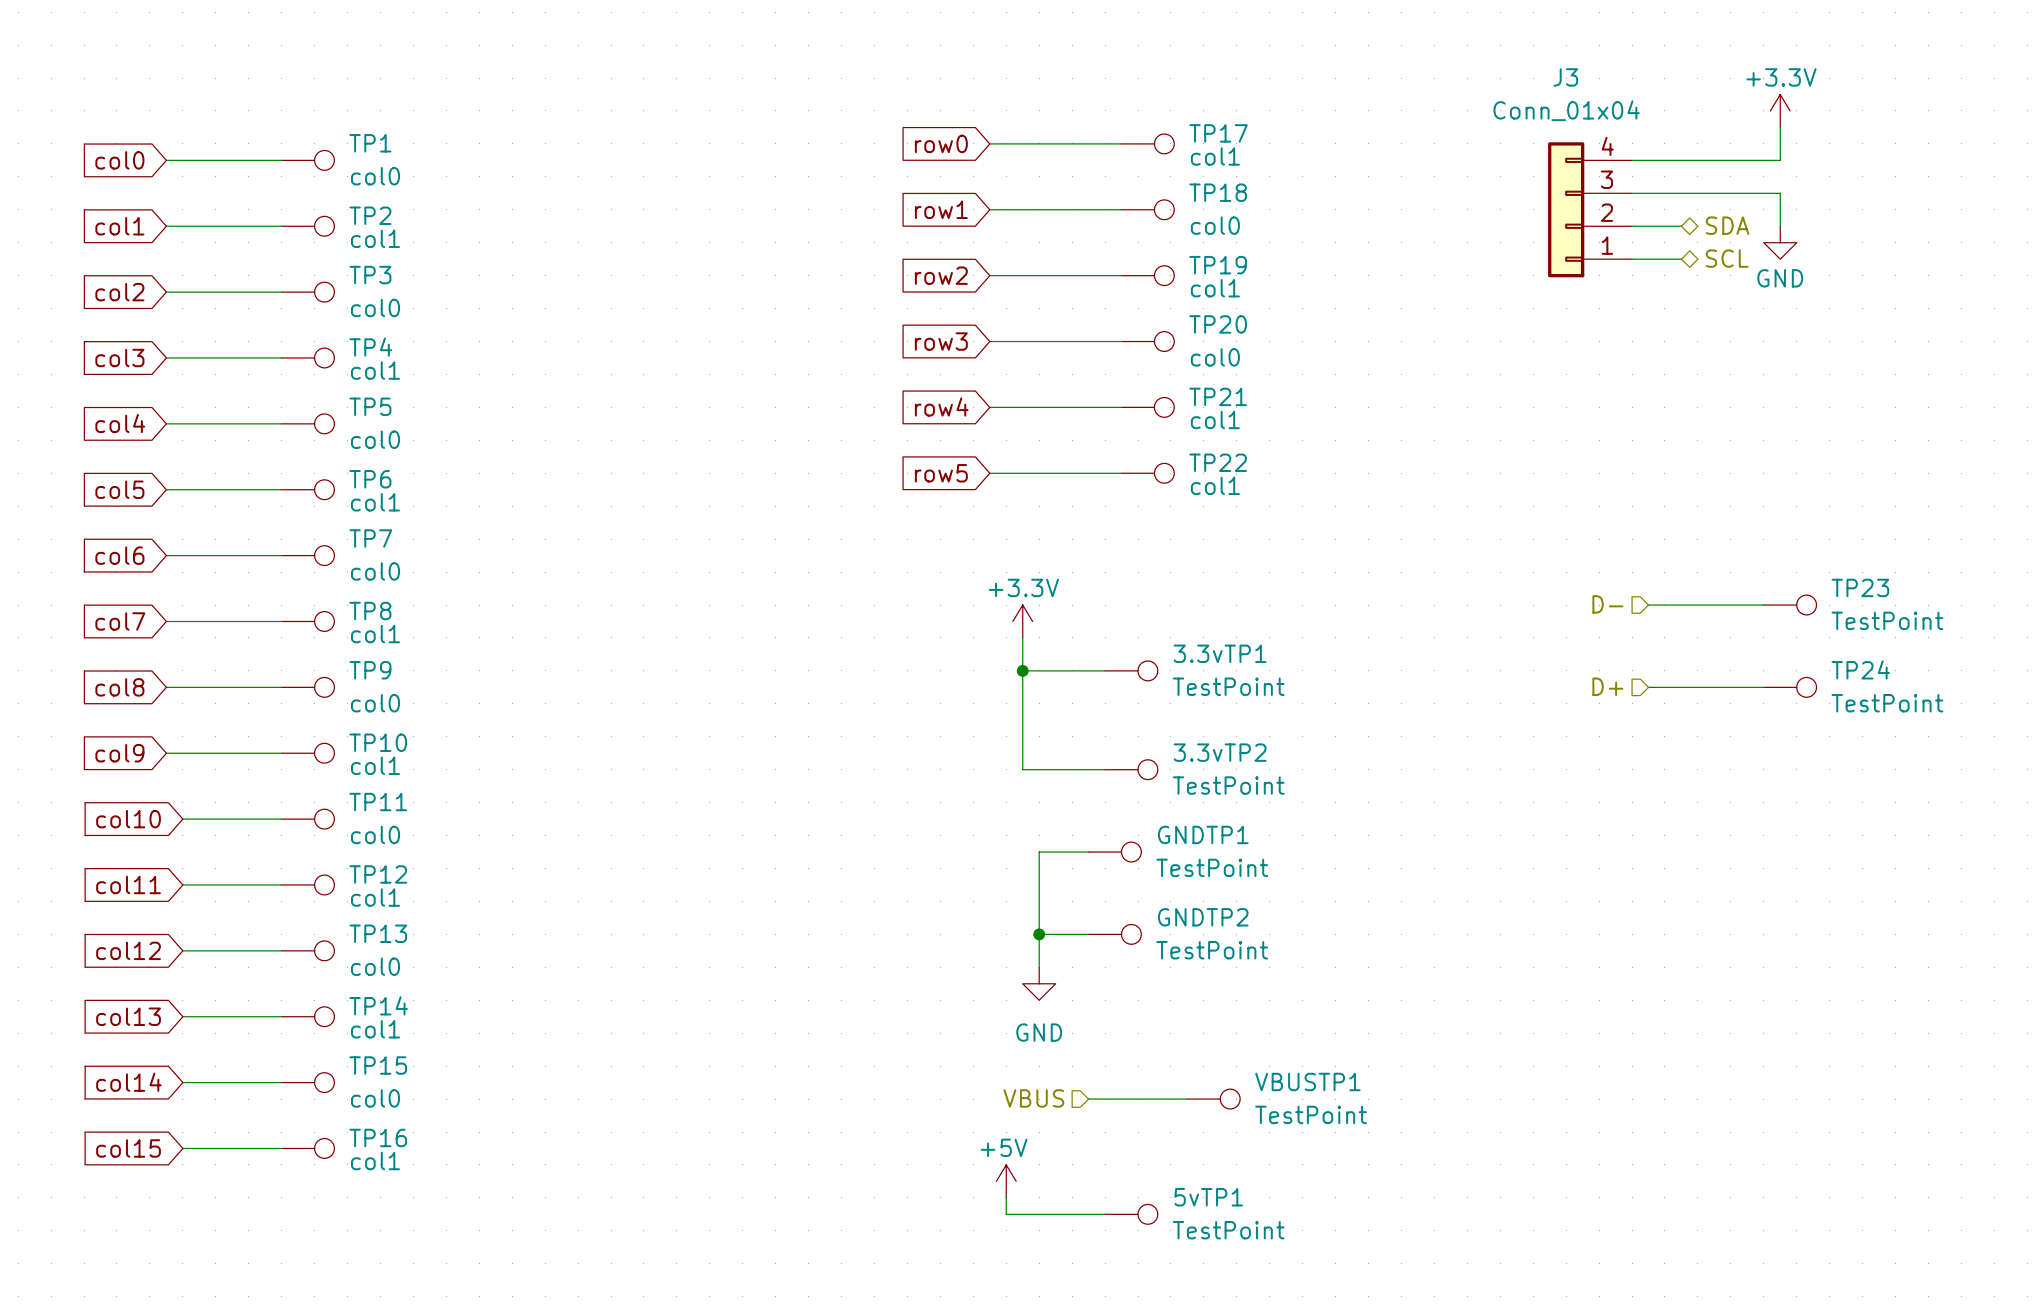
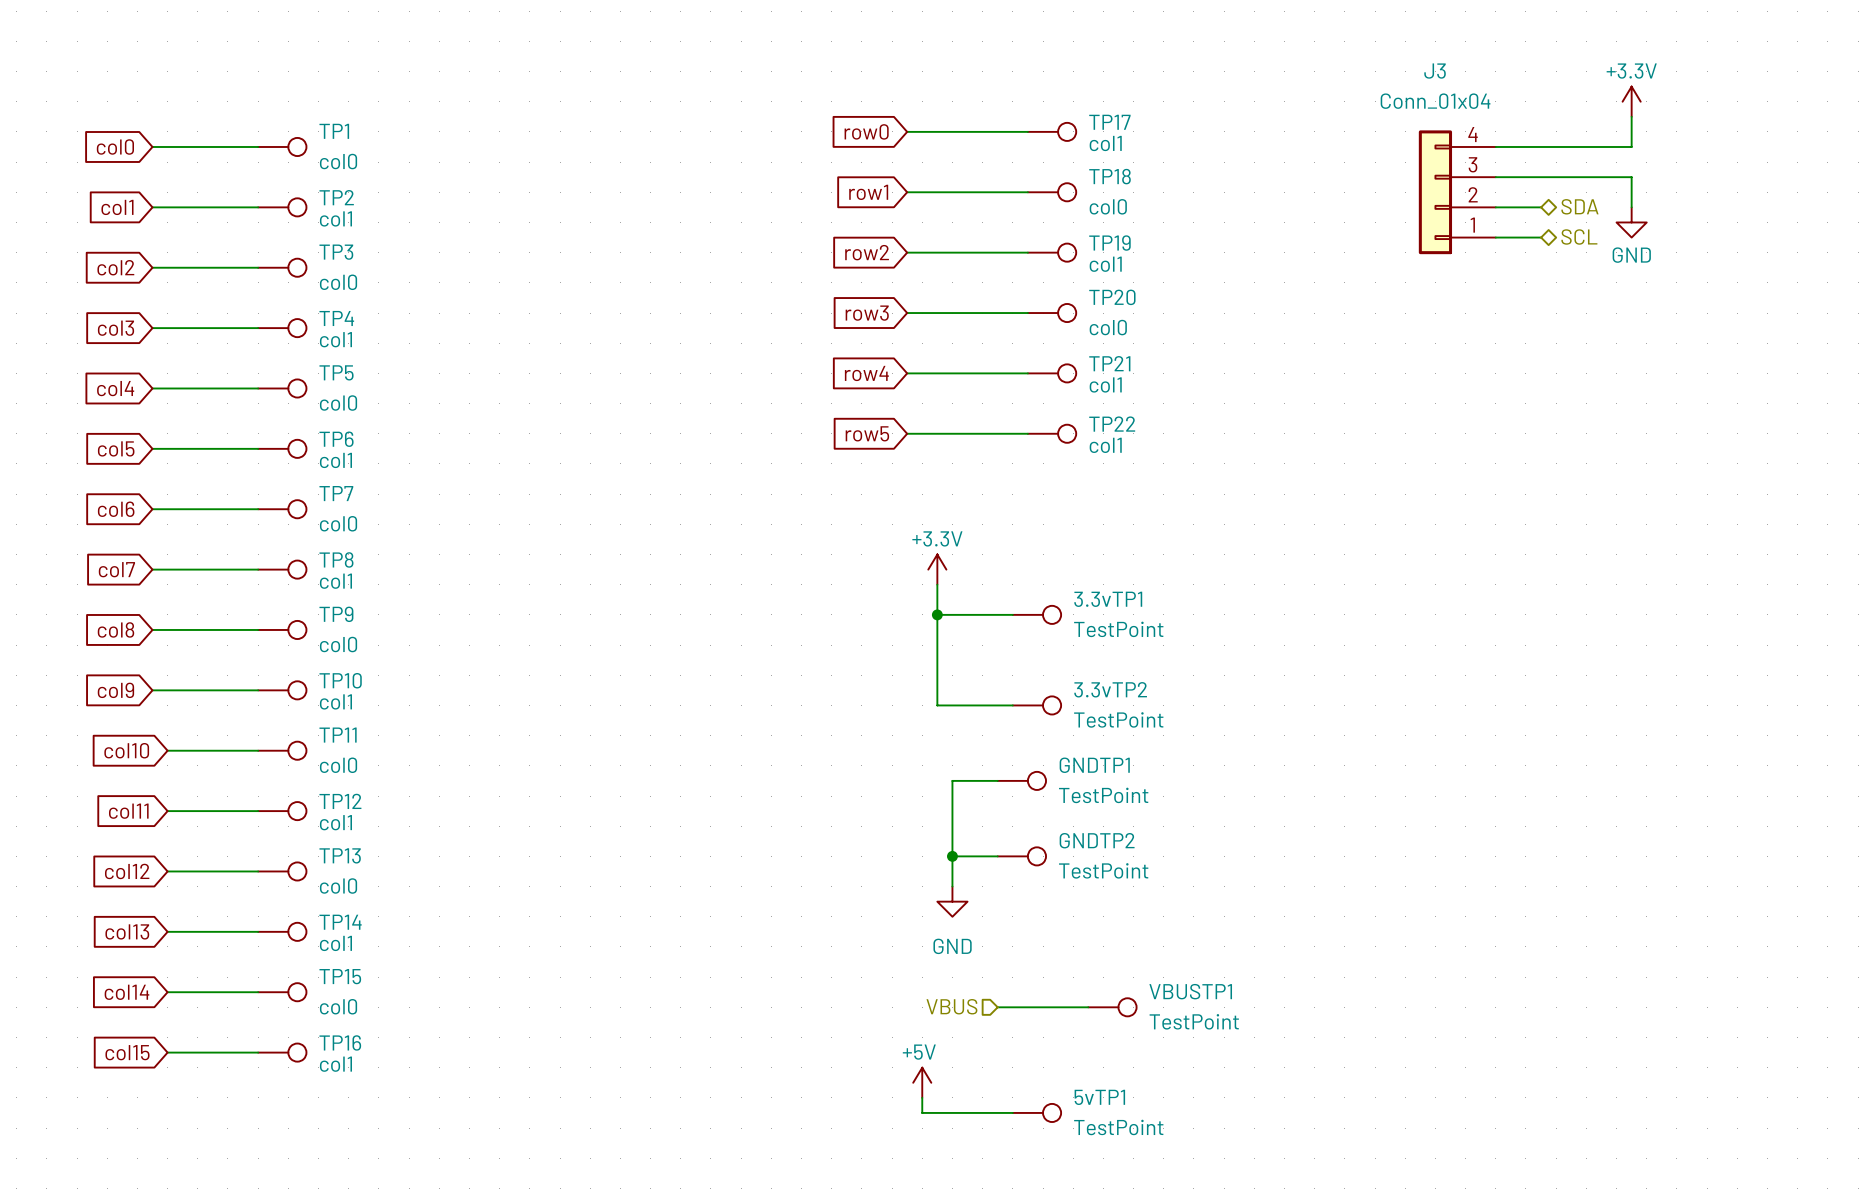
hierarchical label: D- (1607, 604) -> none
wire: (1648, 605) (1763, 605) -> none
TP23: TestPoint (1790, 605) -> none
hierarchical label: D+ (1607, 686) -> none
wire: (1648, 687) (1763, 687) -> none
TP24: TestPoint (1790, 687) -> none

